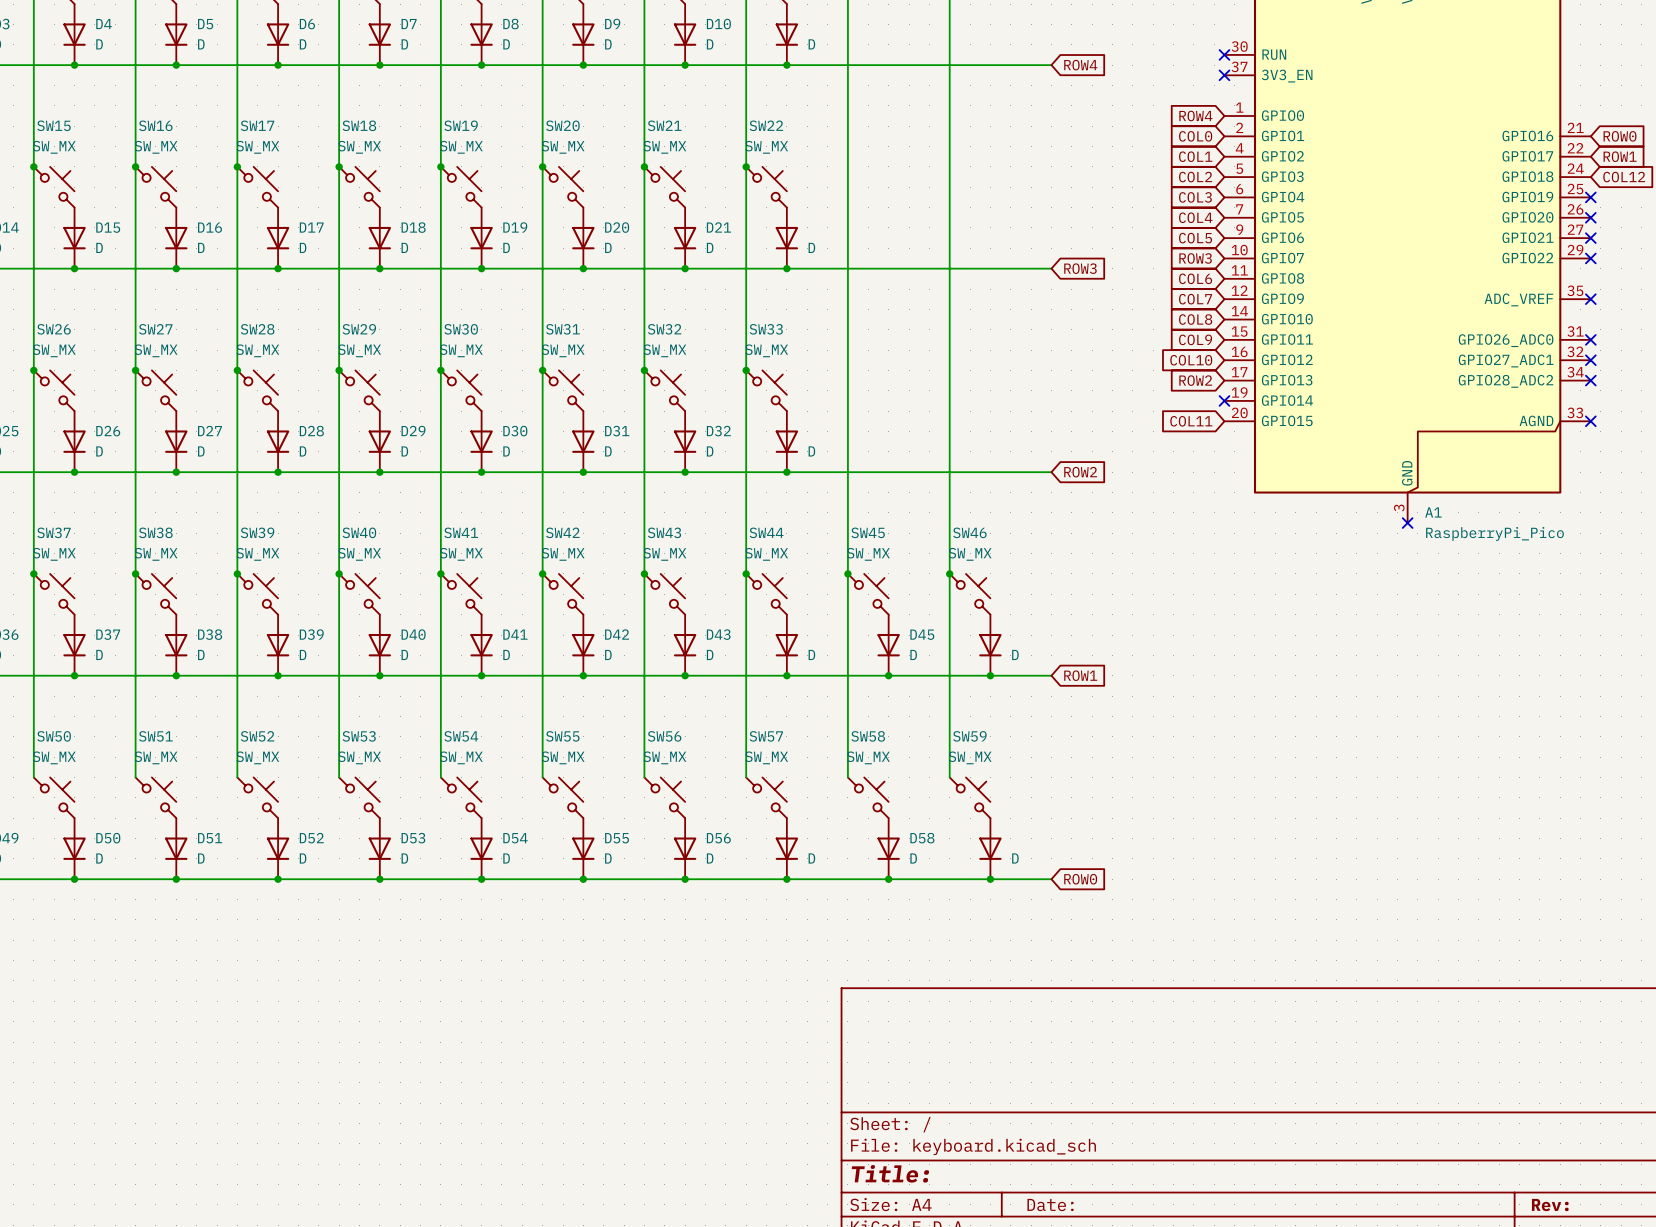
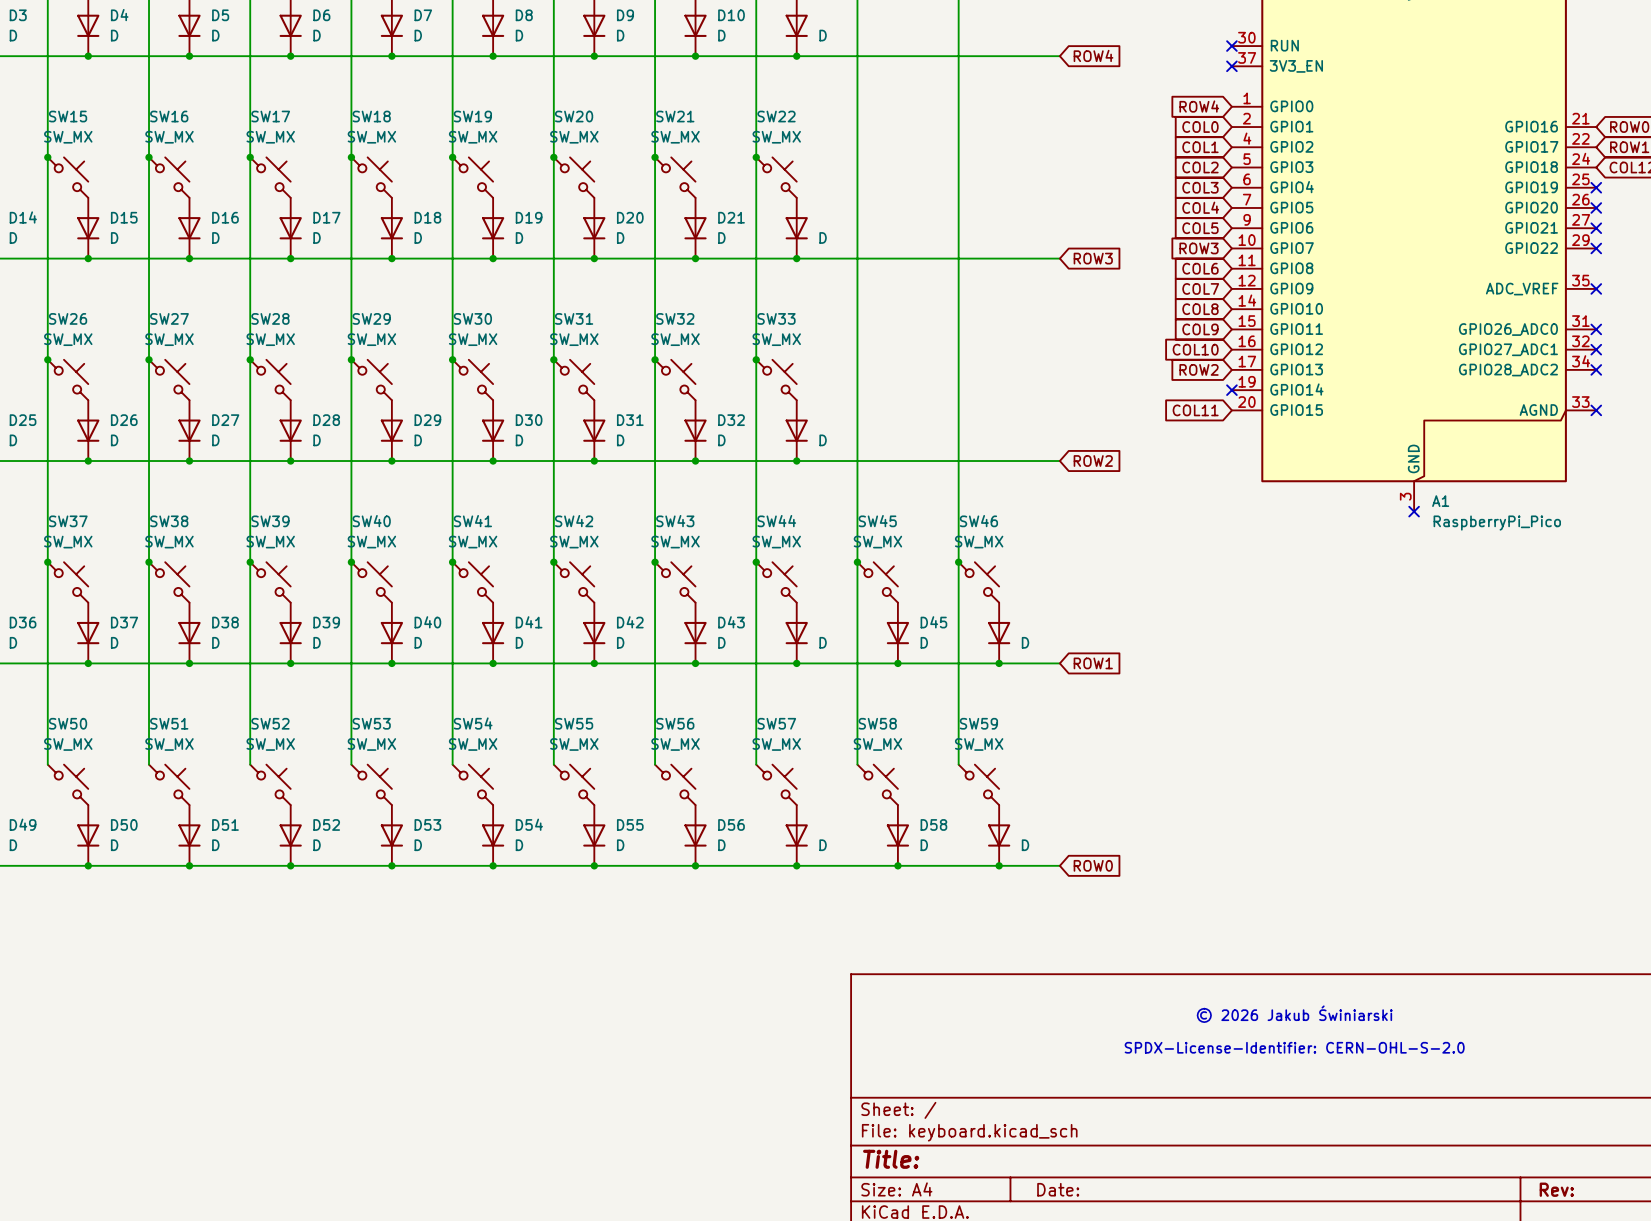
text: none -> © 2026 Jakub Świniarski (1294, 1014)
text: none -> SPDX-License-Identifier: CERN-OHL-S-2.0 (1294, 1047)

